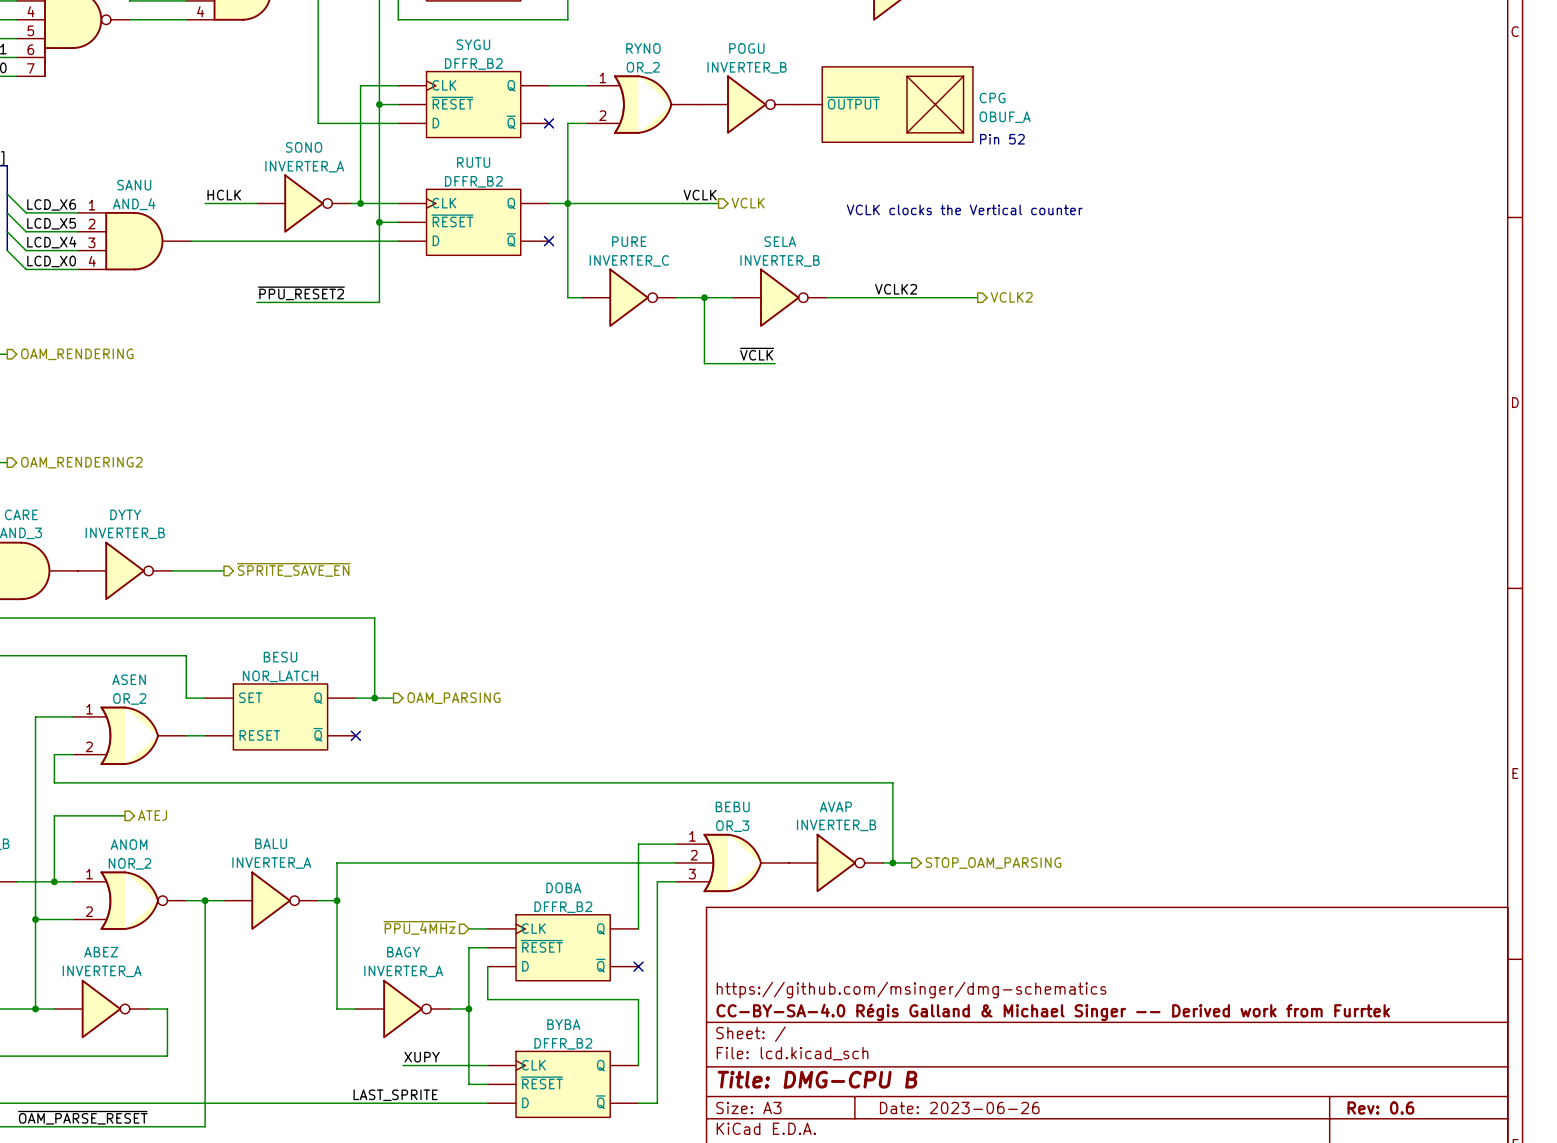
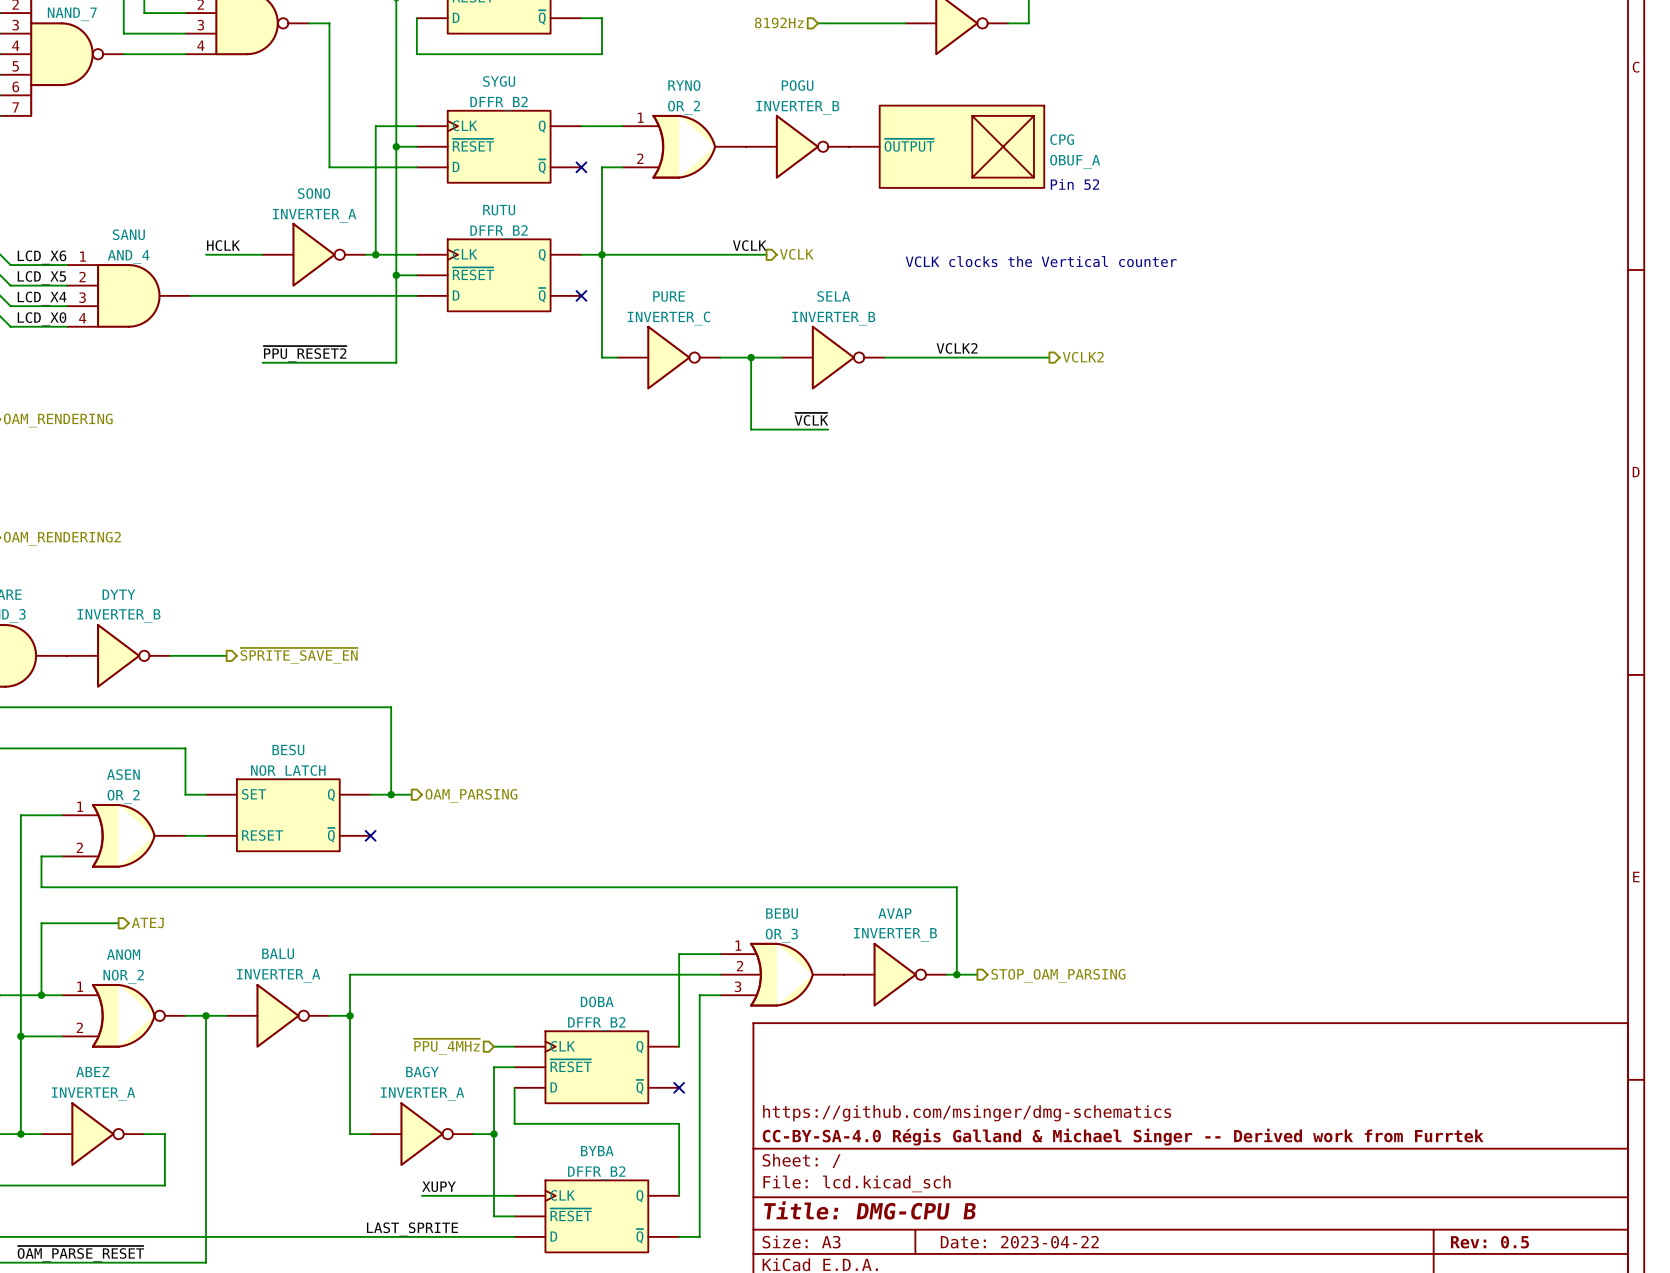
title block: Date: 2023-06-26 (959, 1108) -> Date: 2023-04-22 (1019, 1242)
title block: Rev: 0.6 (1380, 1108) -> Rev: 0.5 (1489, 1242)

